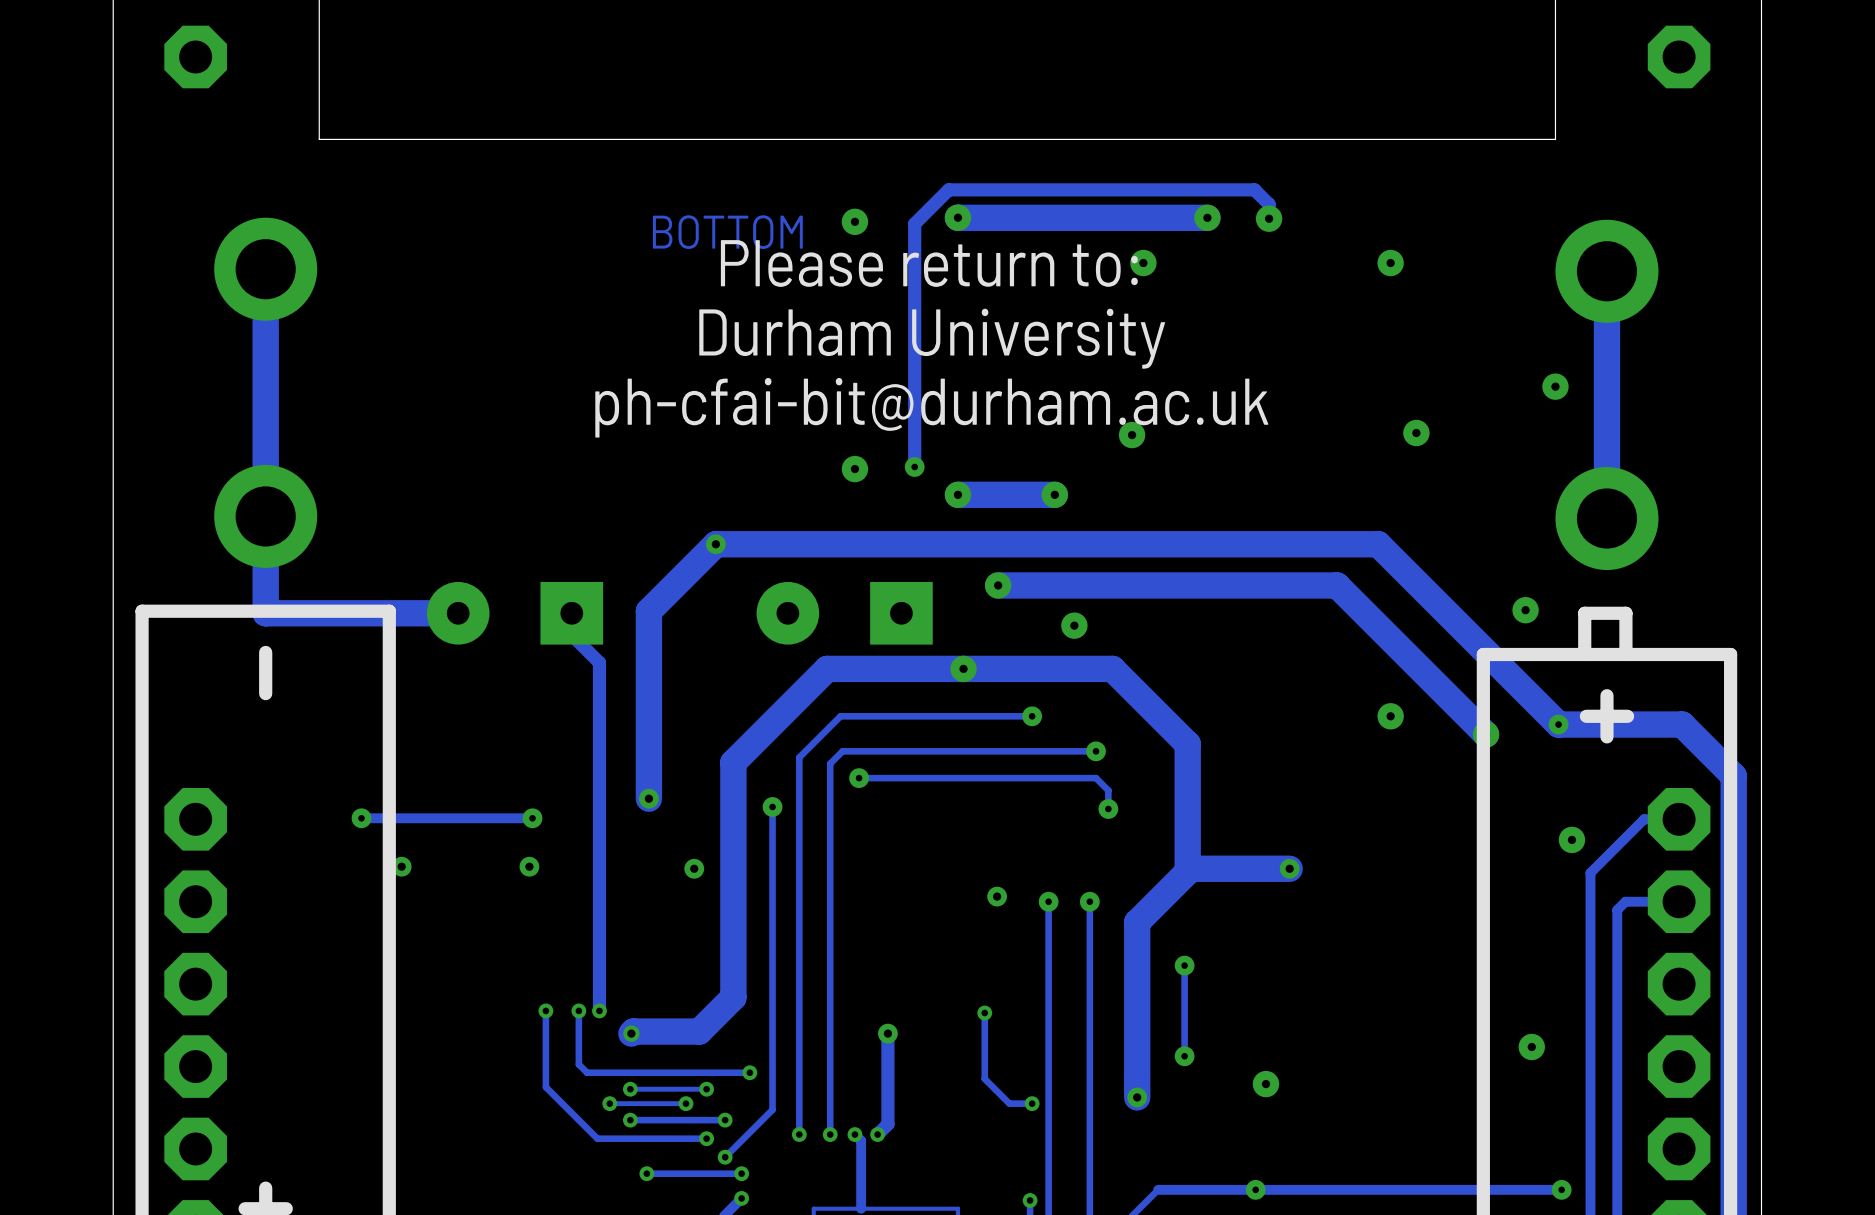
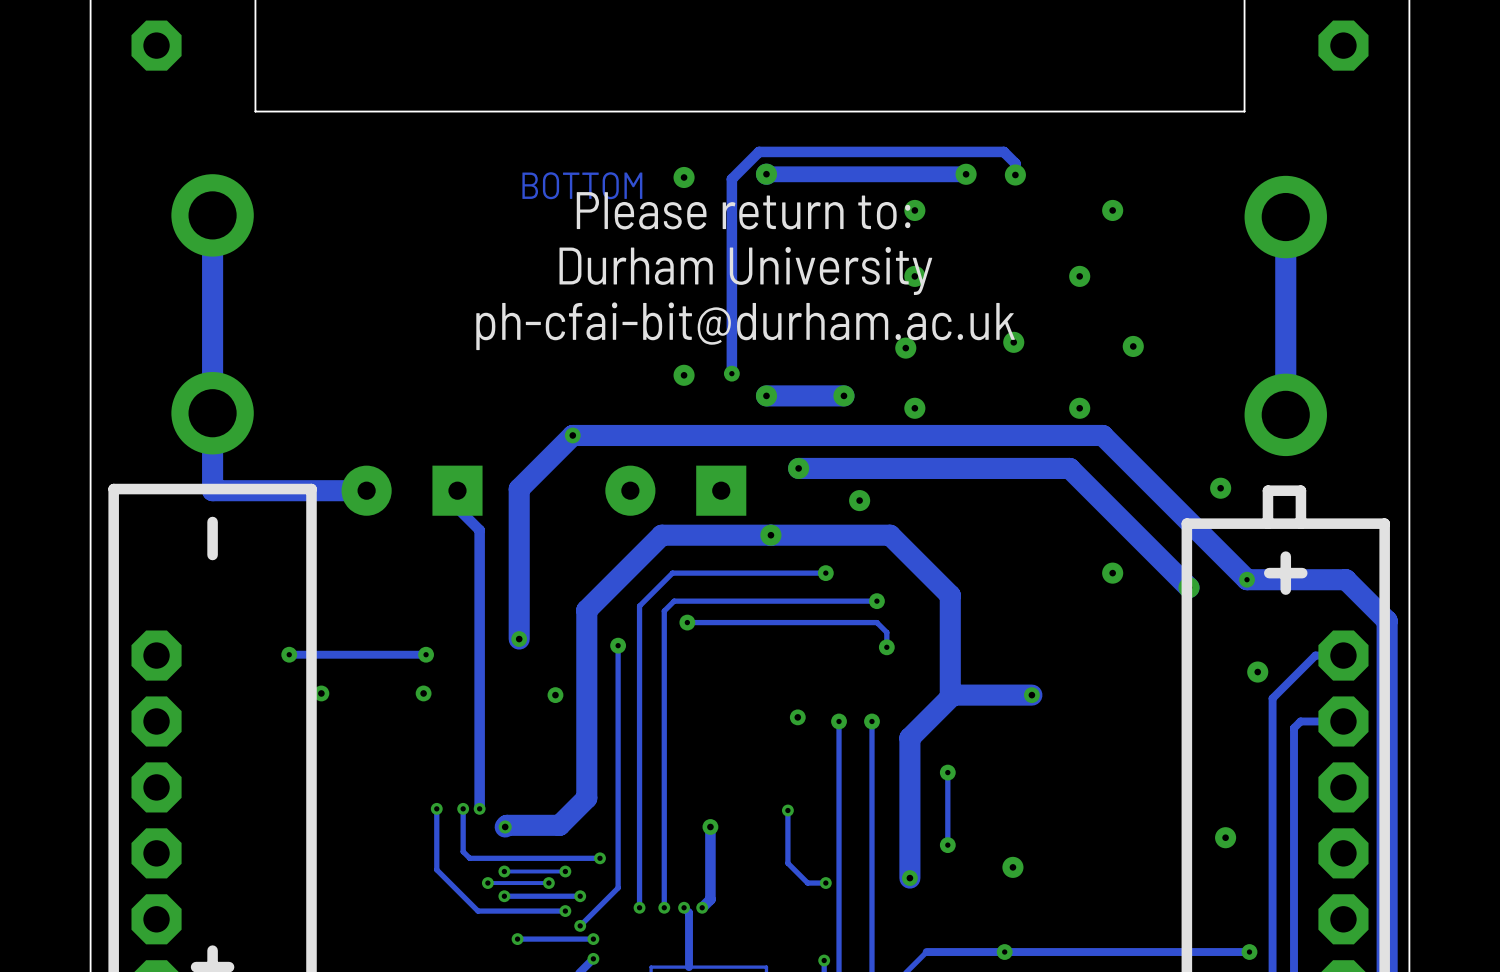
track width: thick (1207, 217) (958, 217) -> thin (966, 174) (766, 174)
via: none -> (914, 276)
via: none -> (1079, 276)
via: (1555, 386) -> none
via: none -> (1013, 342)
via: none -> (914, 408)
via: none -> (1079, 408)

